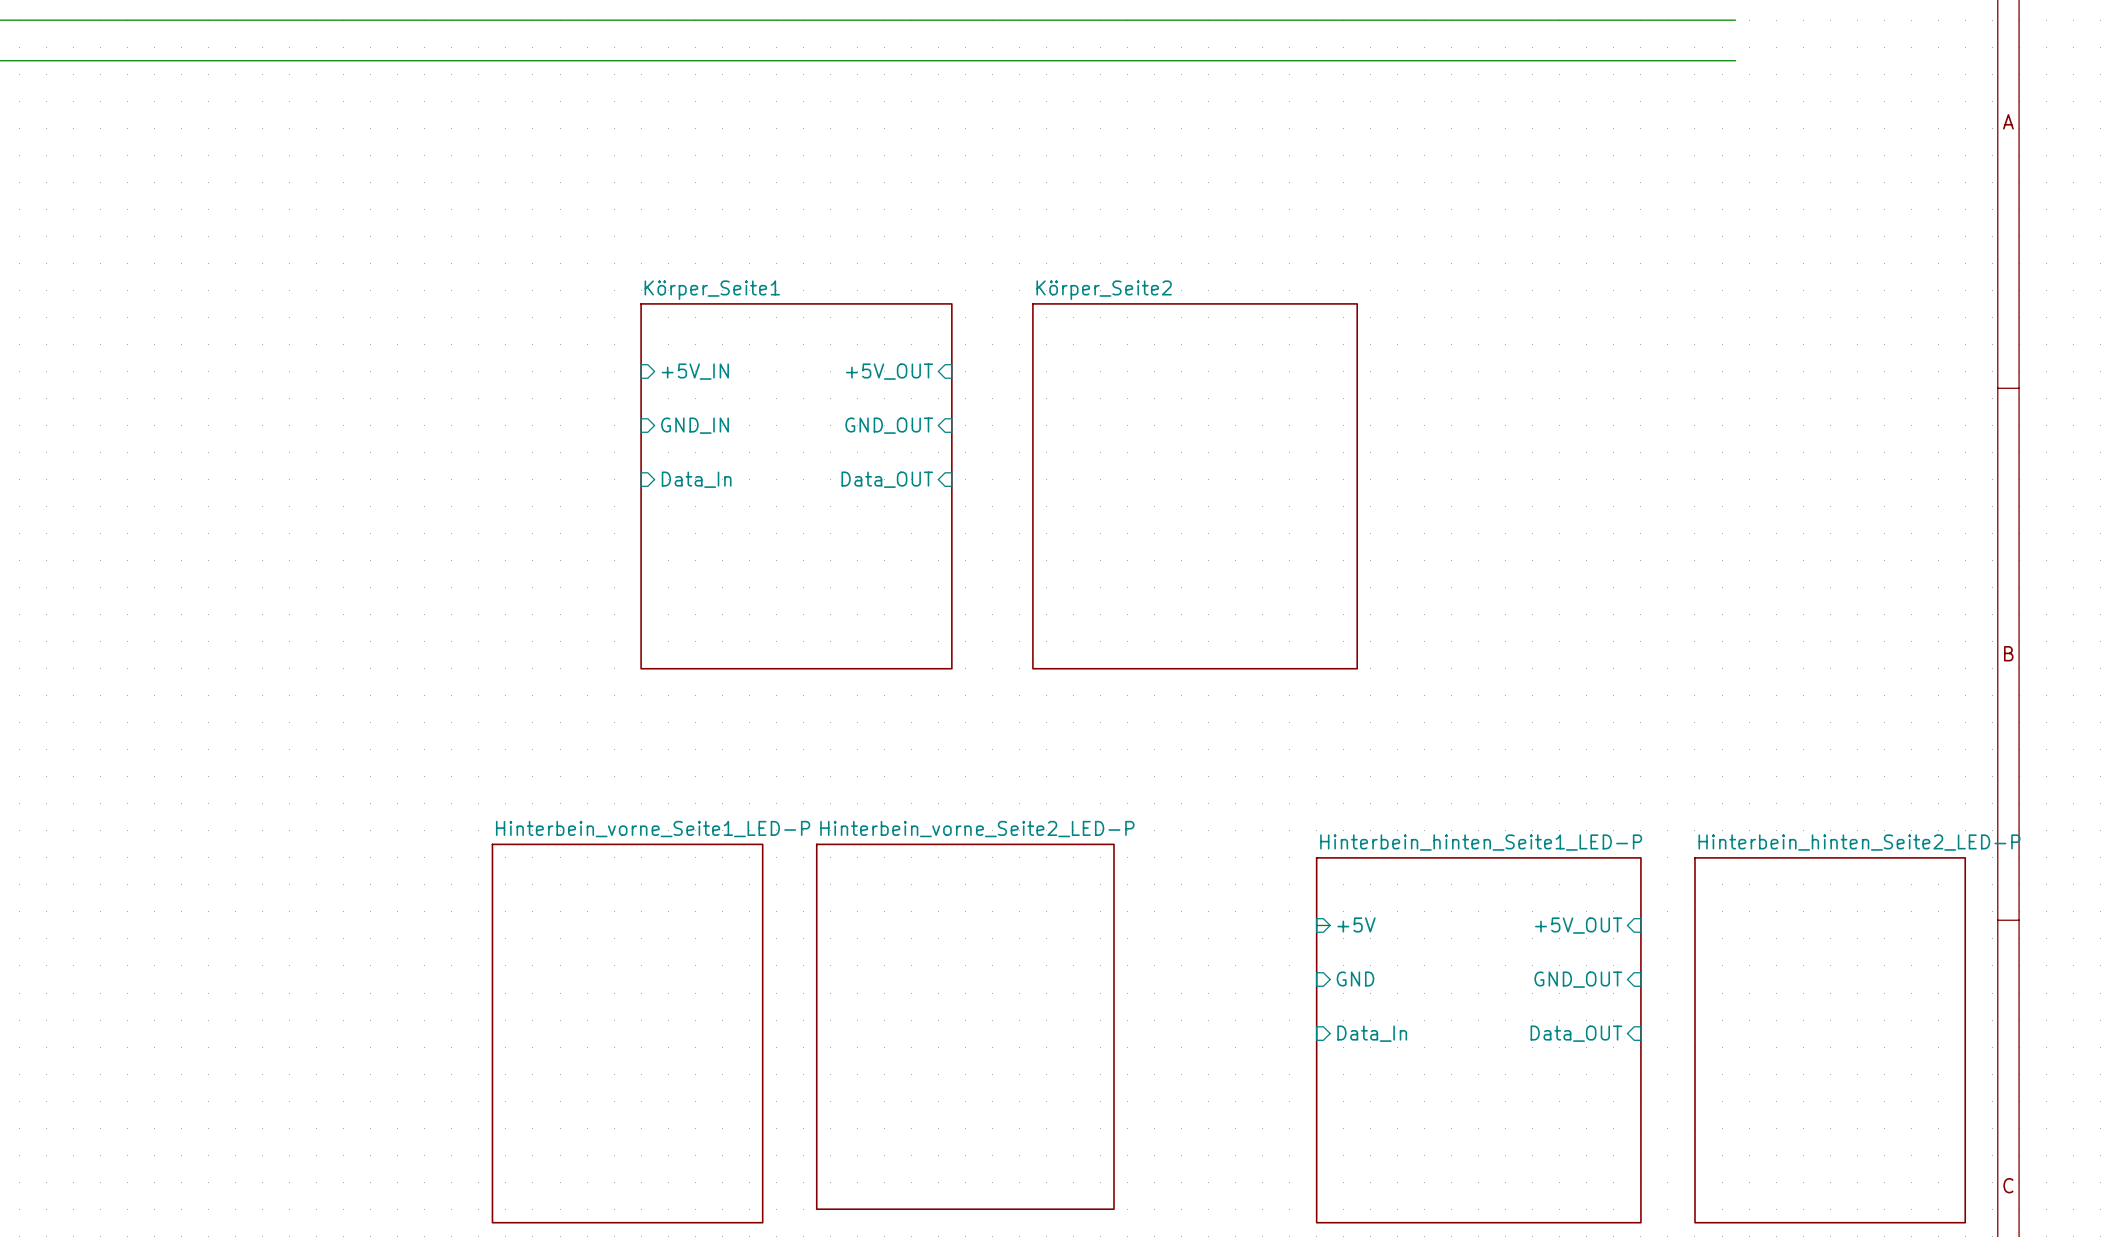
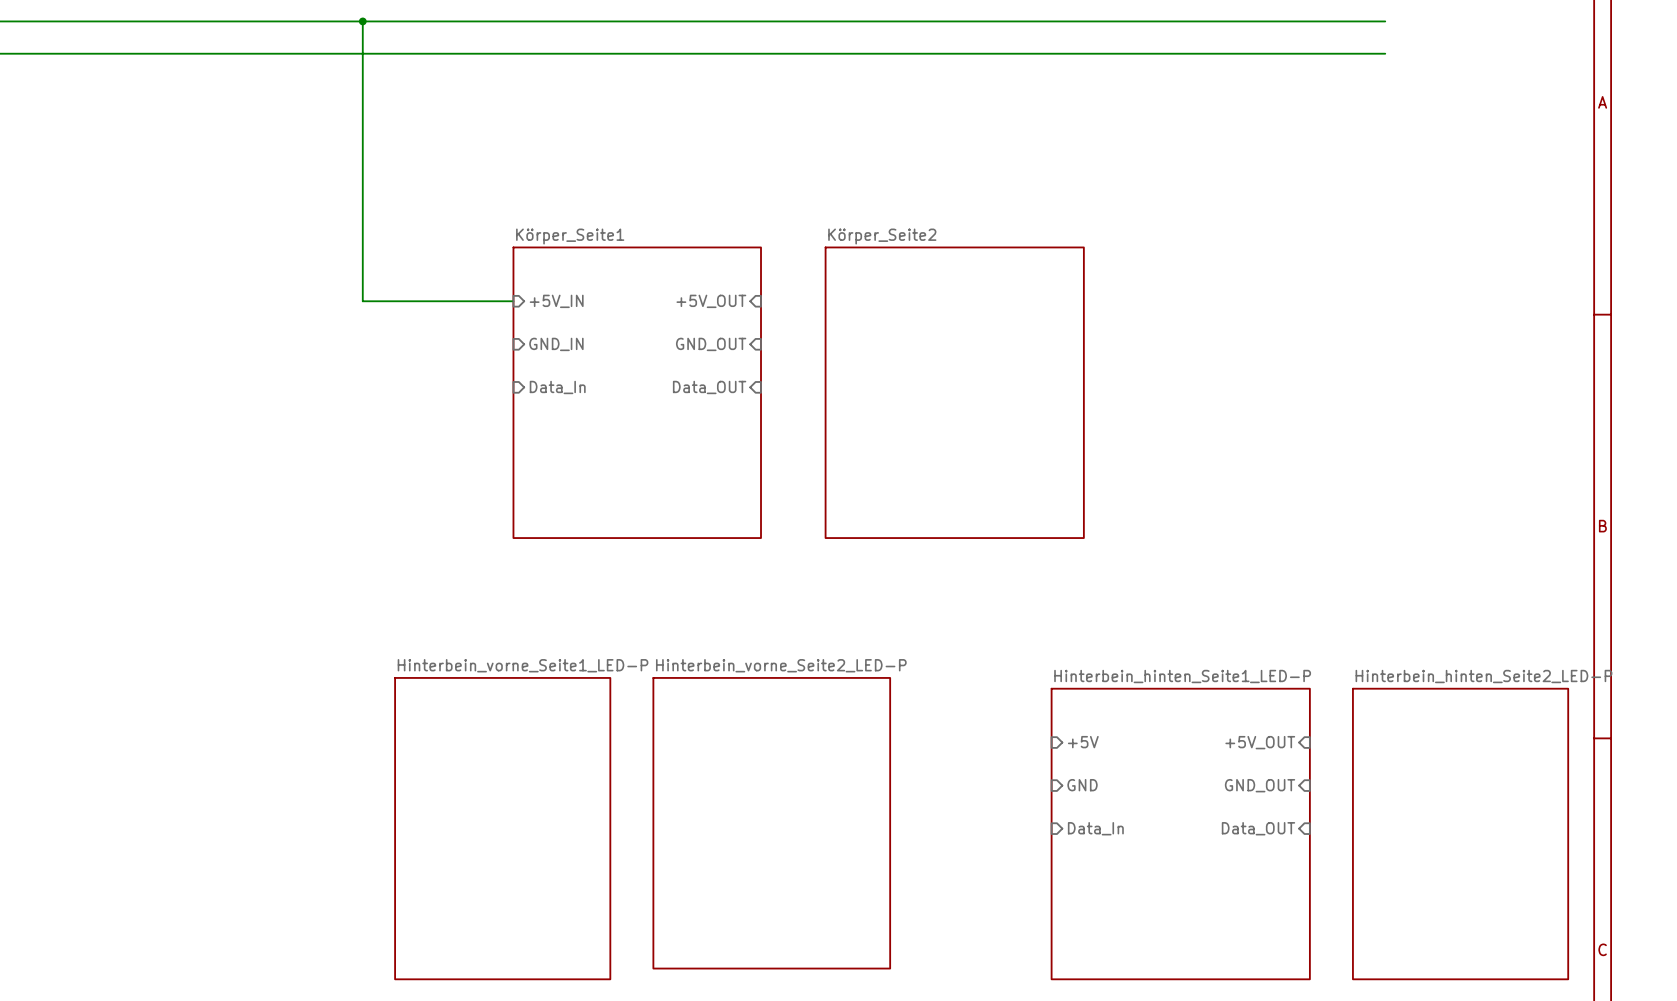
wire: none -> (362, 21) (362, 301) (513, 301)
junction: none -> (362, 21)
wire: (1316, 925) (1330, 925) -> none

